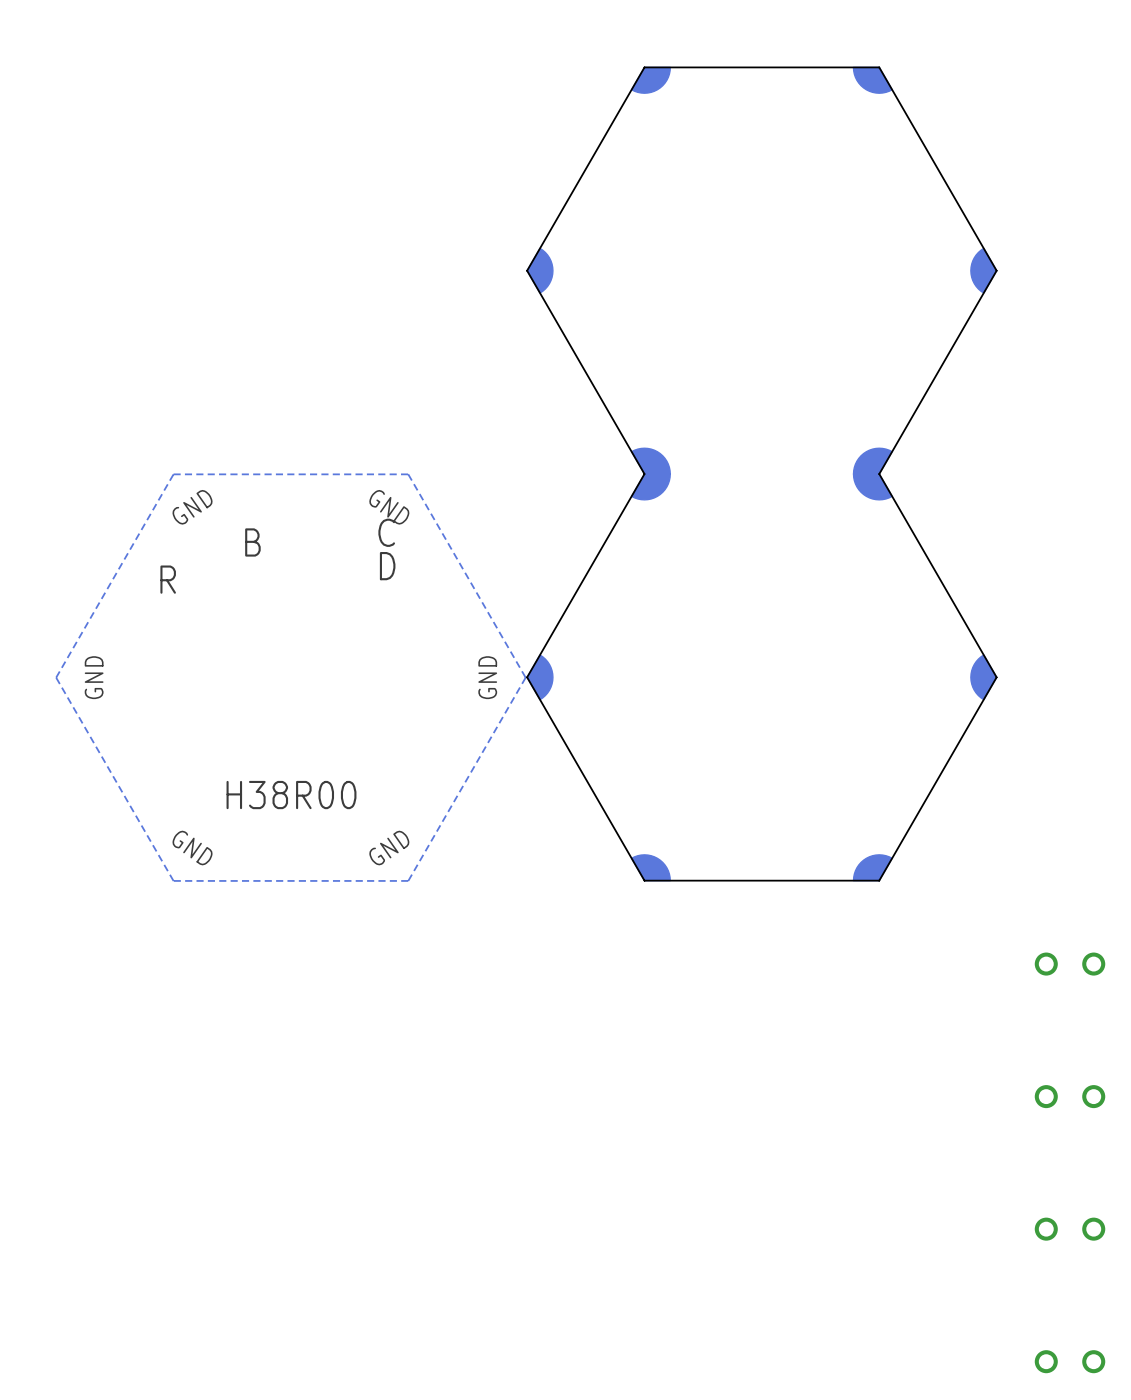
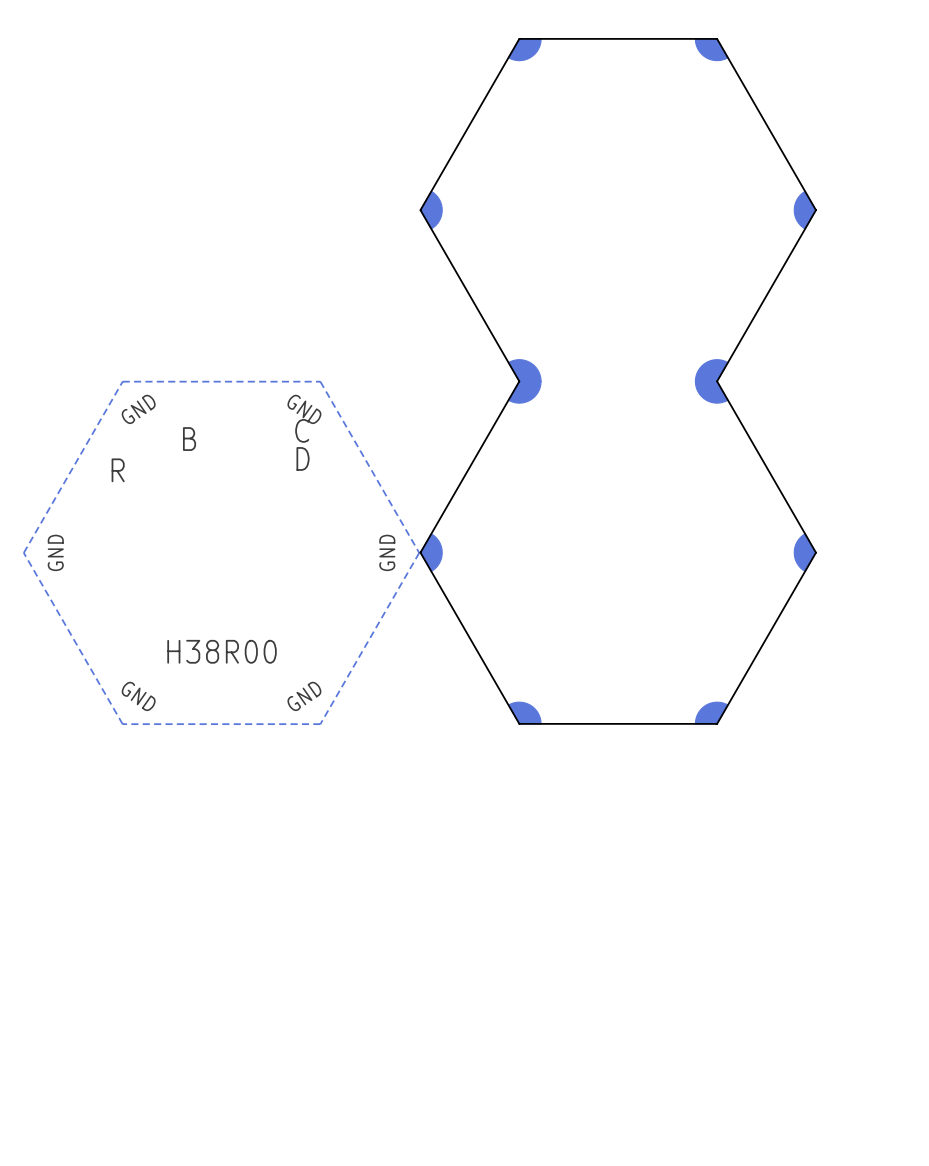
part: (1070, 964) -> none
part: (1070, 1096) -> none
part: (1070, 1229) -> none
part: (1070, 1361) -> none

